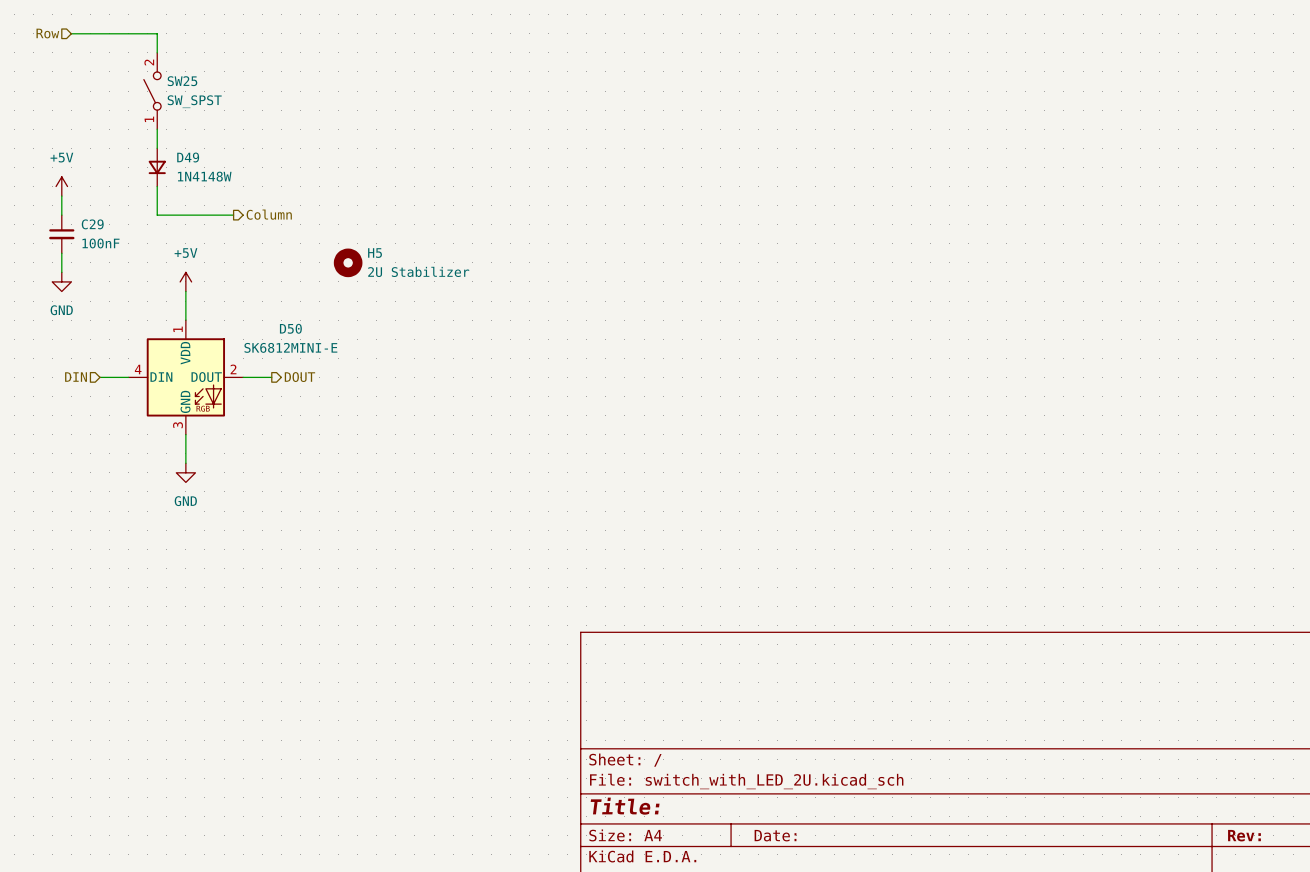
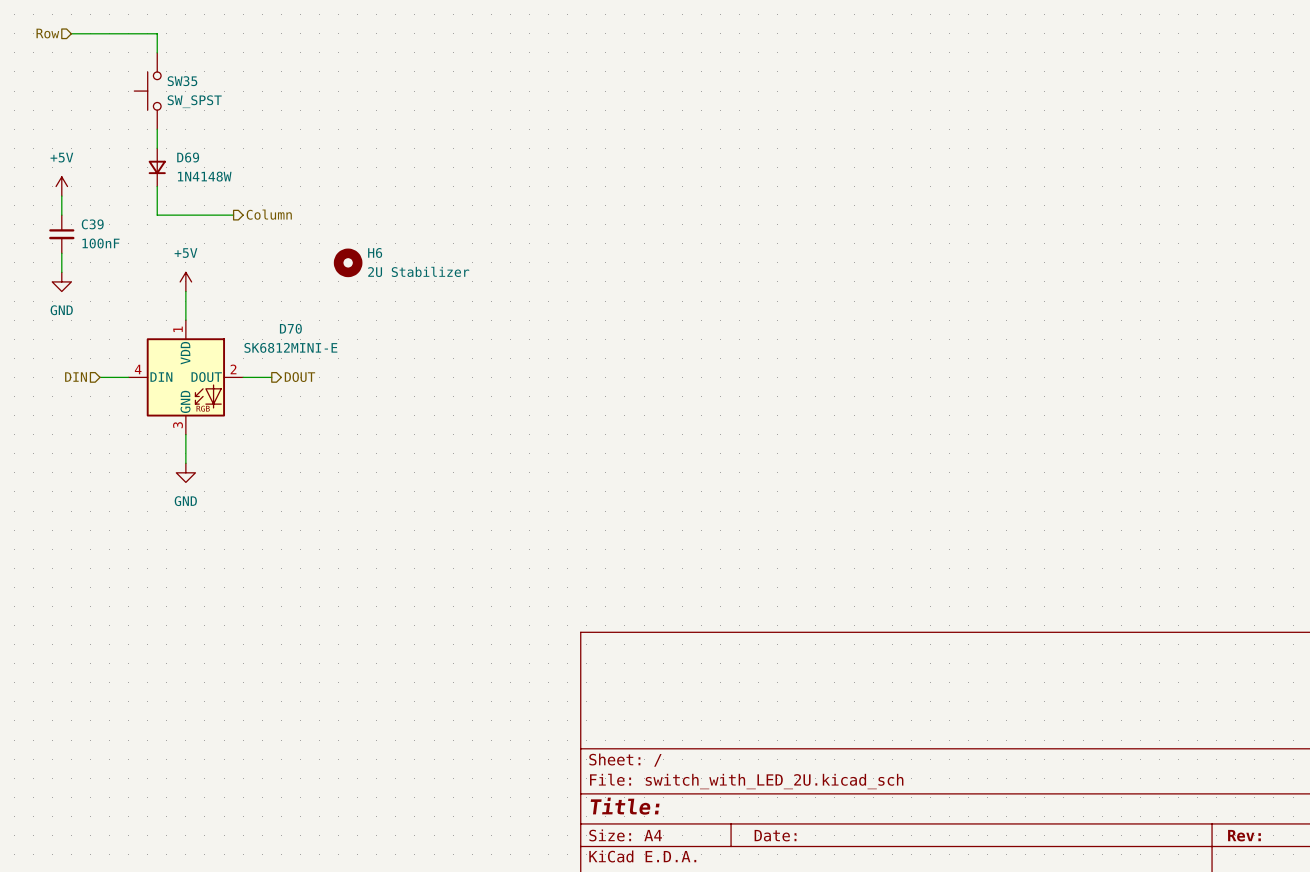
SW35: none -> SW_SPST (147, 91)
SW25: SW_SPST (152, 91) -> none
D49 name: D49 (188, 157) -> D69 (188, 157)
C29 name: C29 (92, 224) -> C39 (92, 224)
H5 name: H5 (375, 253) -> H6 (375, 252)
D50 name: D50 (290, 328) -> D70 (290, 328)

